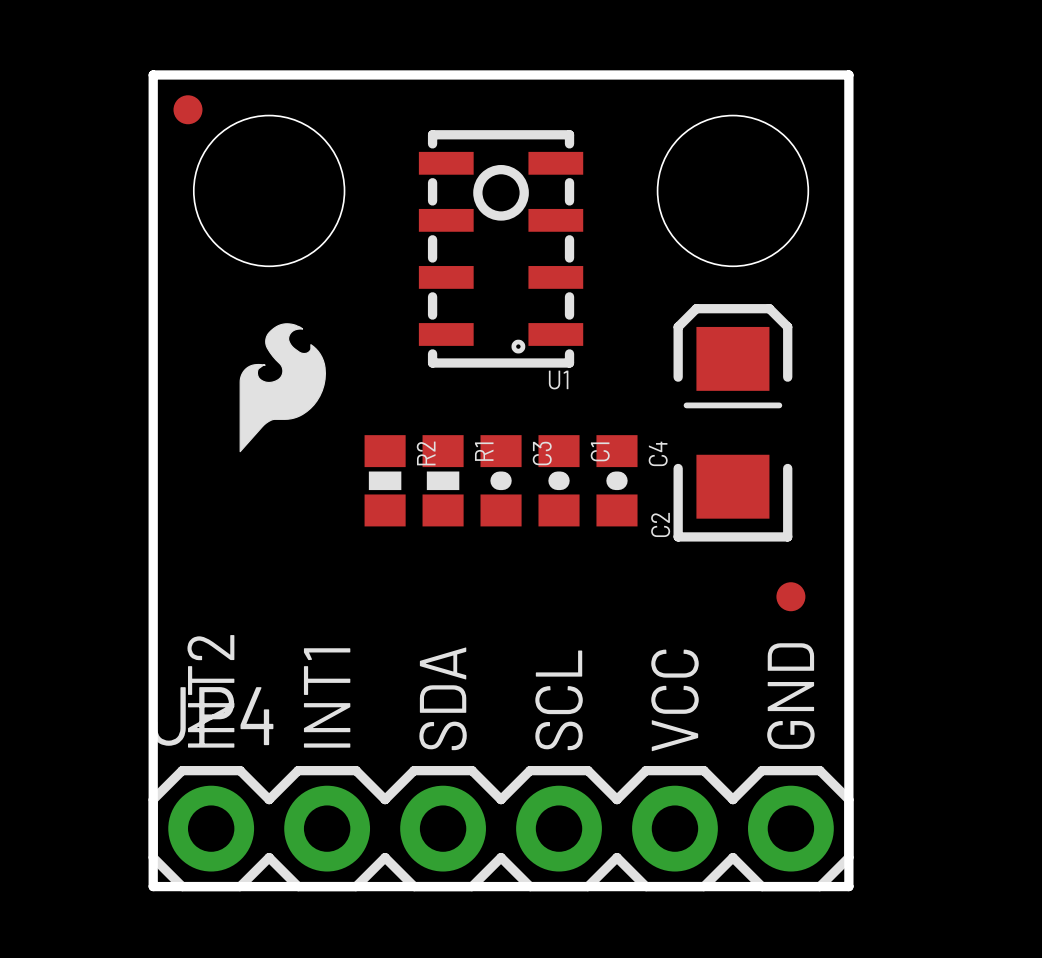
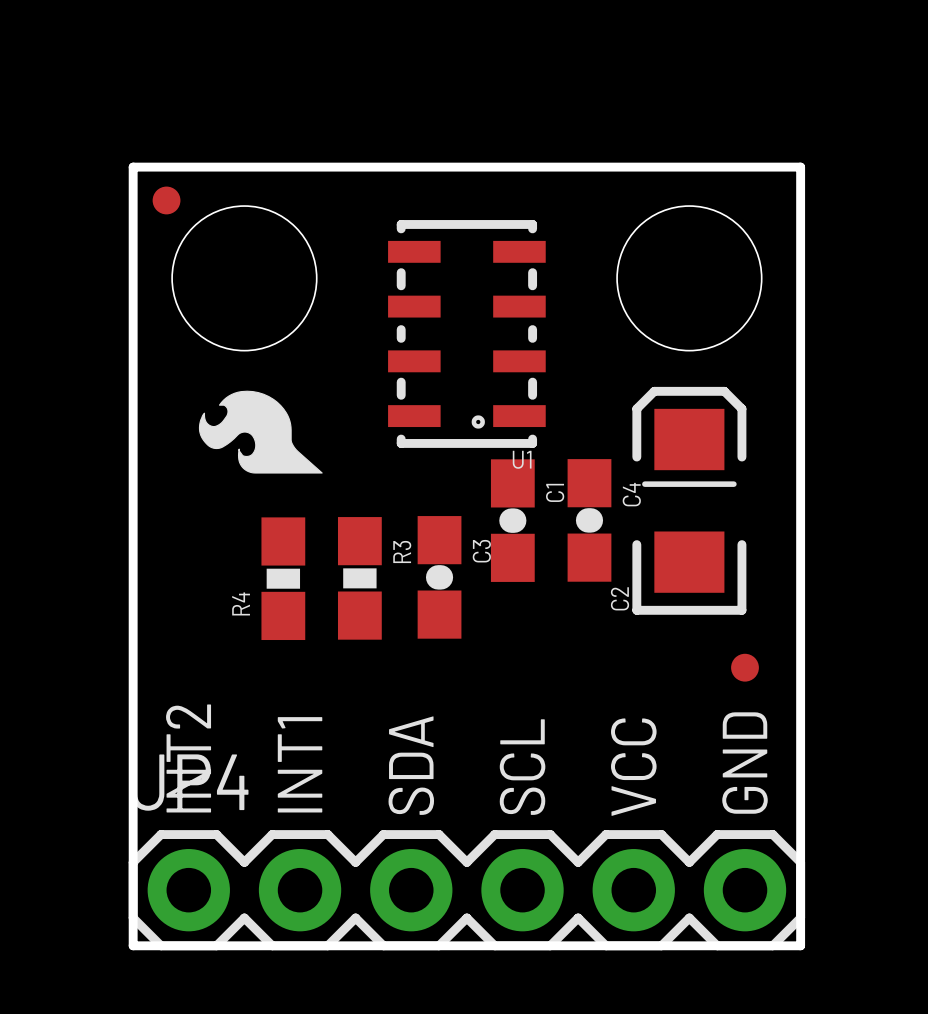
U1 footprint: [418, 130, 584, 368] -> [388, 220, 546, 448]
drawing shape: [239, 323, 326, 453] -> [198, 390, 323, 474]
C3 footprint: [480, 435, 522, 527] -> [417, 516, 462, 639]
C1 footprint: [538, 435, 580, 527] -> [490, 459, 535, 582]
C4 footprint: [596, 435, 638, 527] -> [567, 459, 612, 582]
R2: (385, 480) -> none
R1: (443, 480) -> none
R4: none -> (283, 578)
R3: none -> (359, 578)

